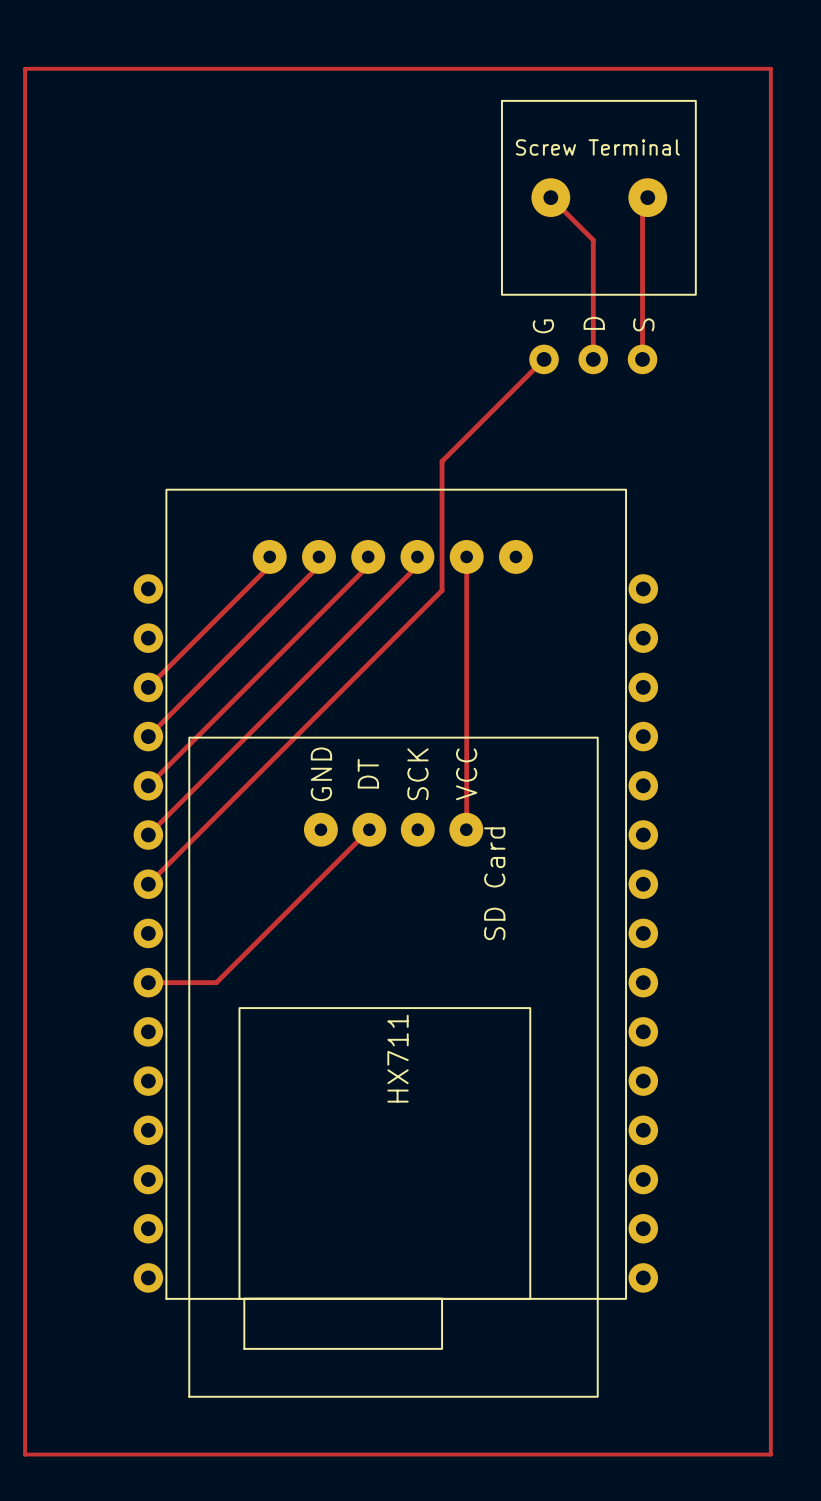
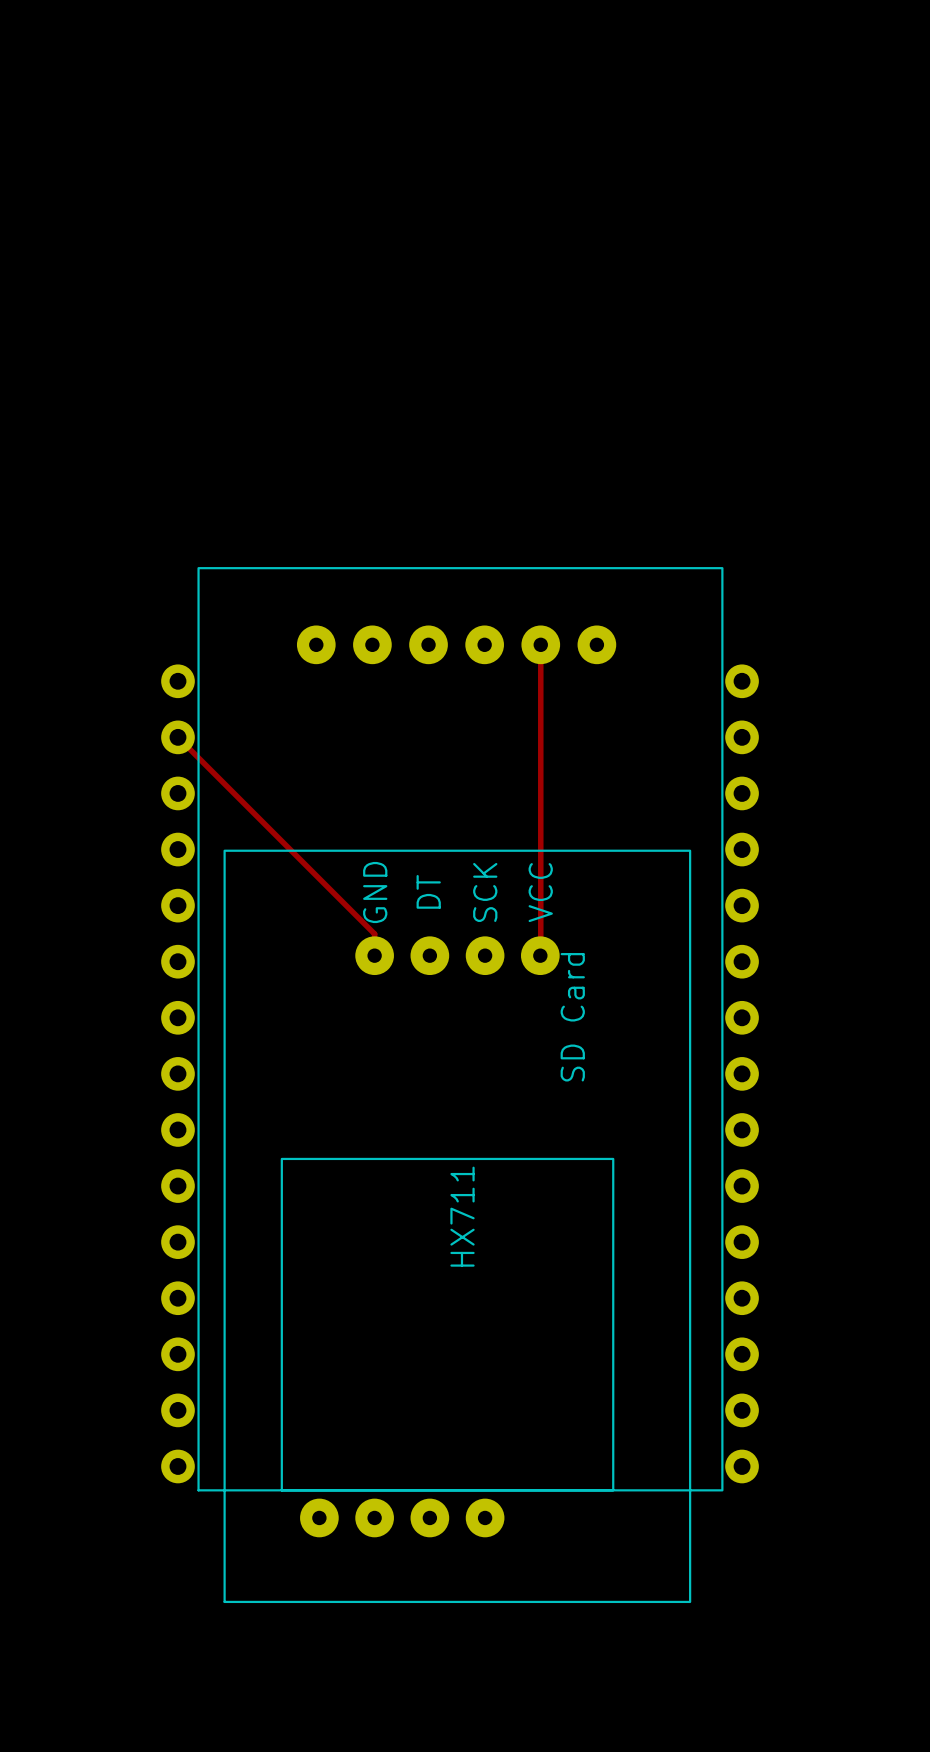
track: (25, 68) (770, 68) (770, 1454) (25, 1454) (25, 68) -> none
track: (550, 197) (593, 240) (593, 359) -> none
part: (598, 197) -> none
track: (647, 197) (642, 202) (642, 359) -> none
track: (544, 359) (442, 461) (442, 590) (148, 884) -> none
part: (593, 359) -> none
track: (269, 556) (269, 566) (148, 687) -> none
track: (318, 556) (318, 565) (148, 736) -> none
track: (368, 556) (368, 565) (148, 785) -> none
track: (417, 556) (417, 565) (148, 835) -> none
track: none -> (177, 737) (374, 934) (374, 955)
part footprint: [188, 736, 599, 1398] -> [223, 849, 692, 1604]
track: (369, 829) (216, 982) (148, 982) -> none

